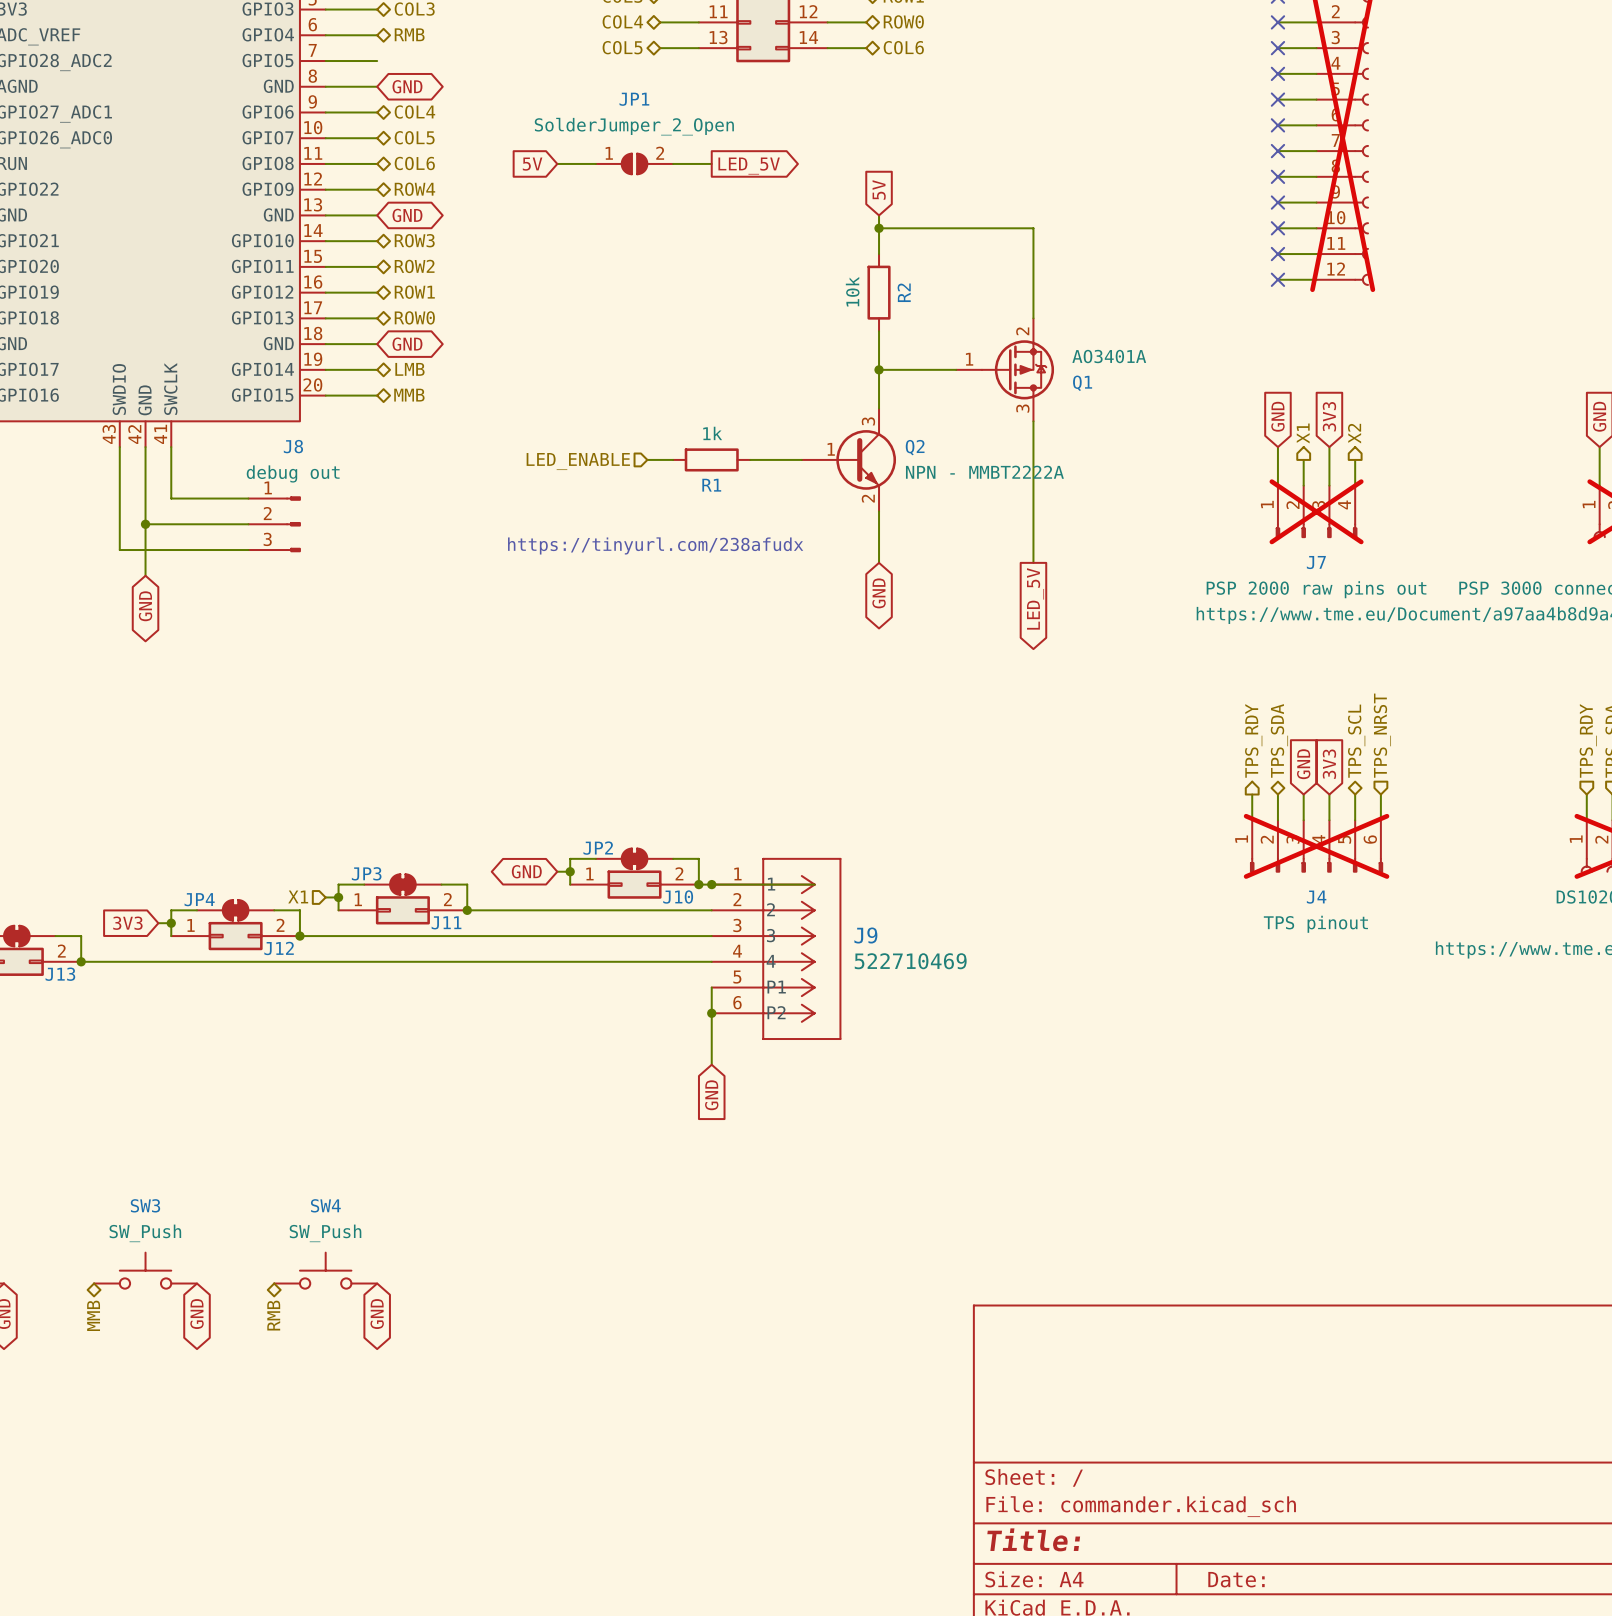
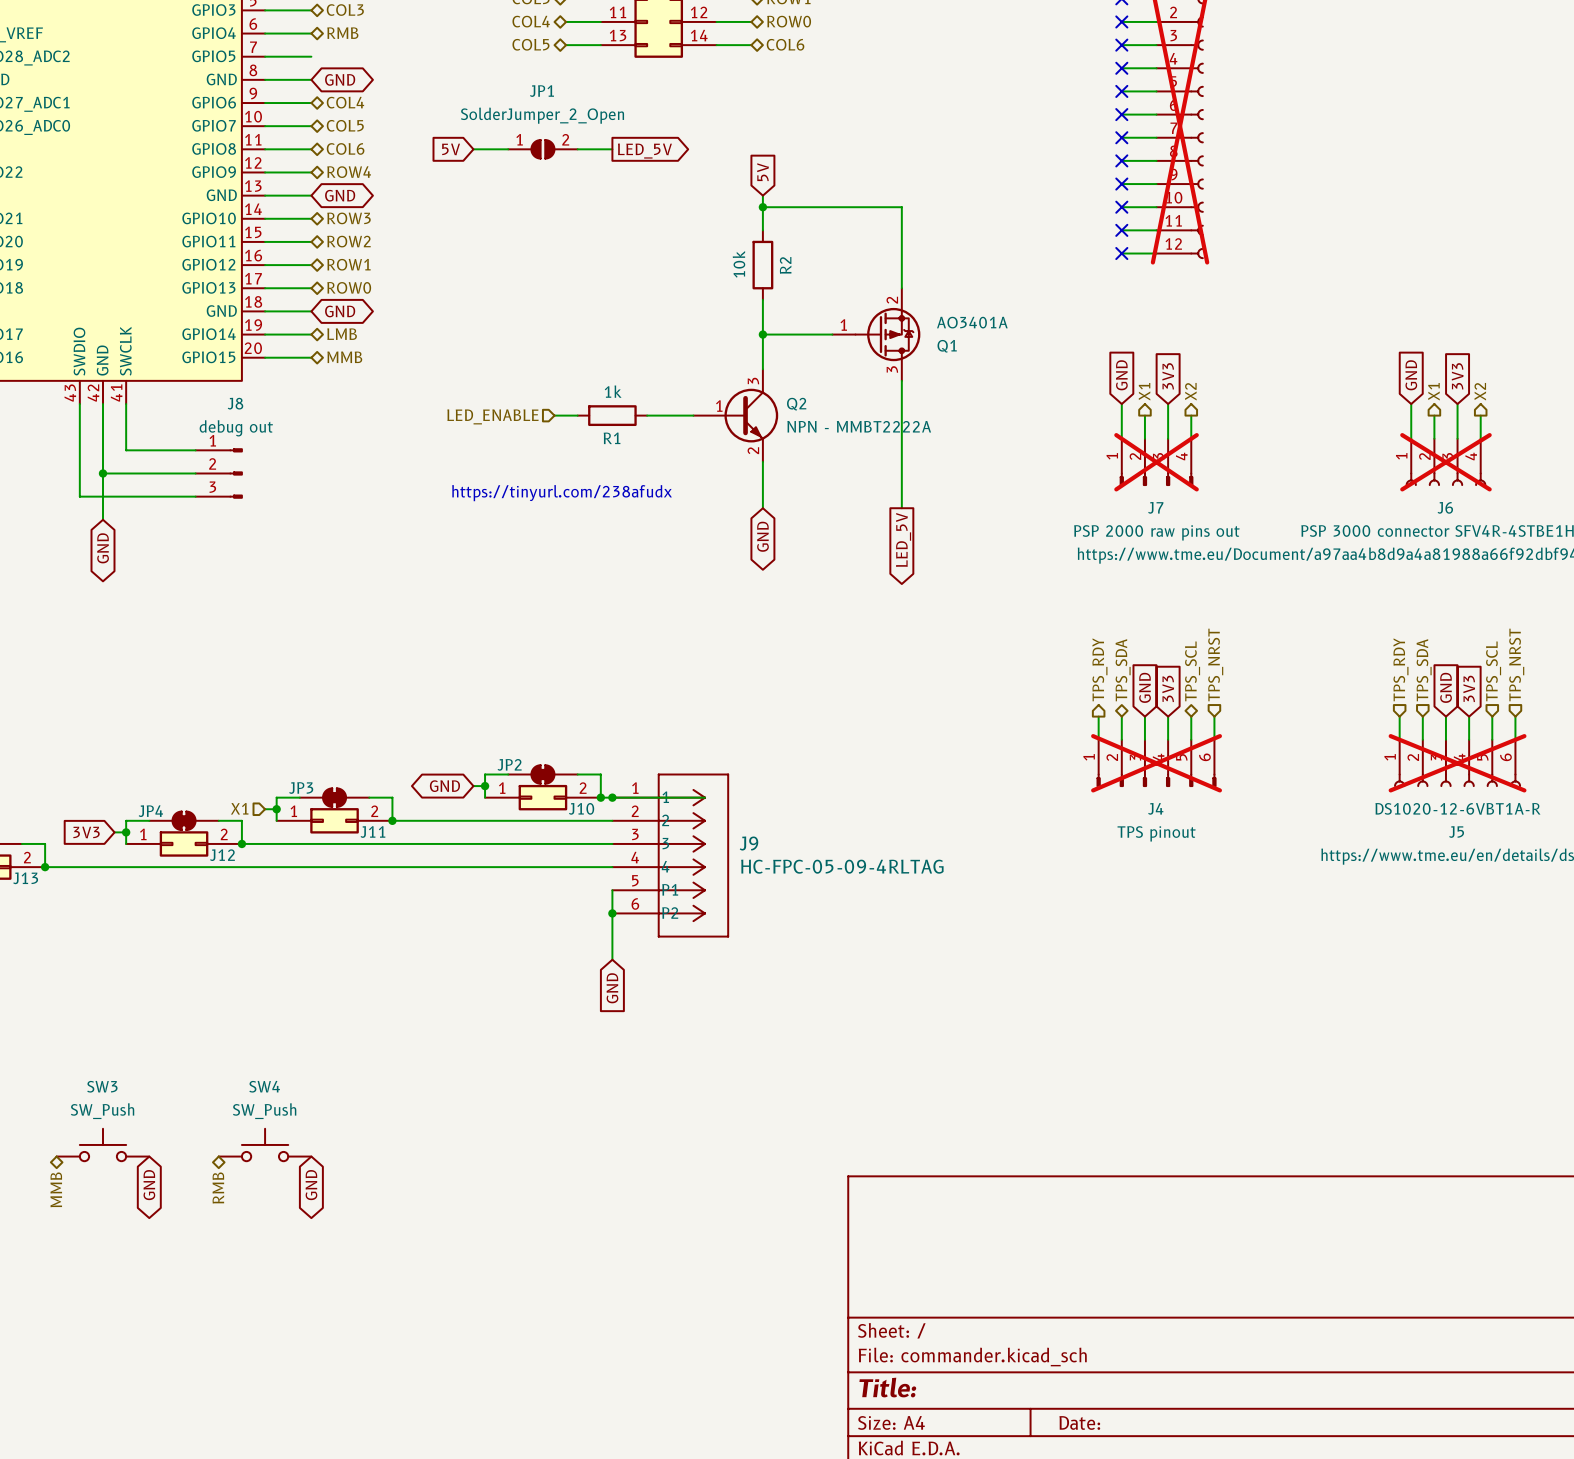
J9 value: 522710469 (910, 961) -> HC-FPC-05-09-4RLTAG (842, 866)

